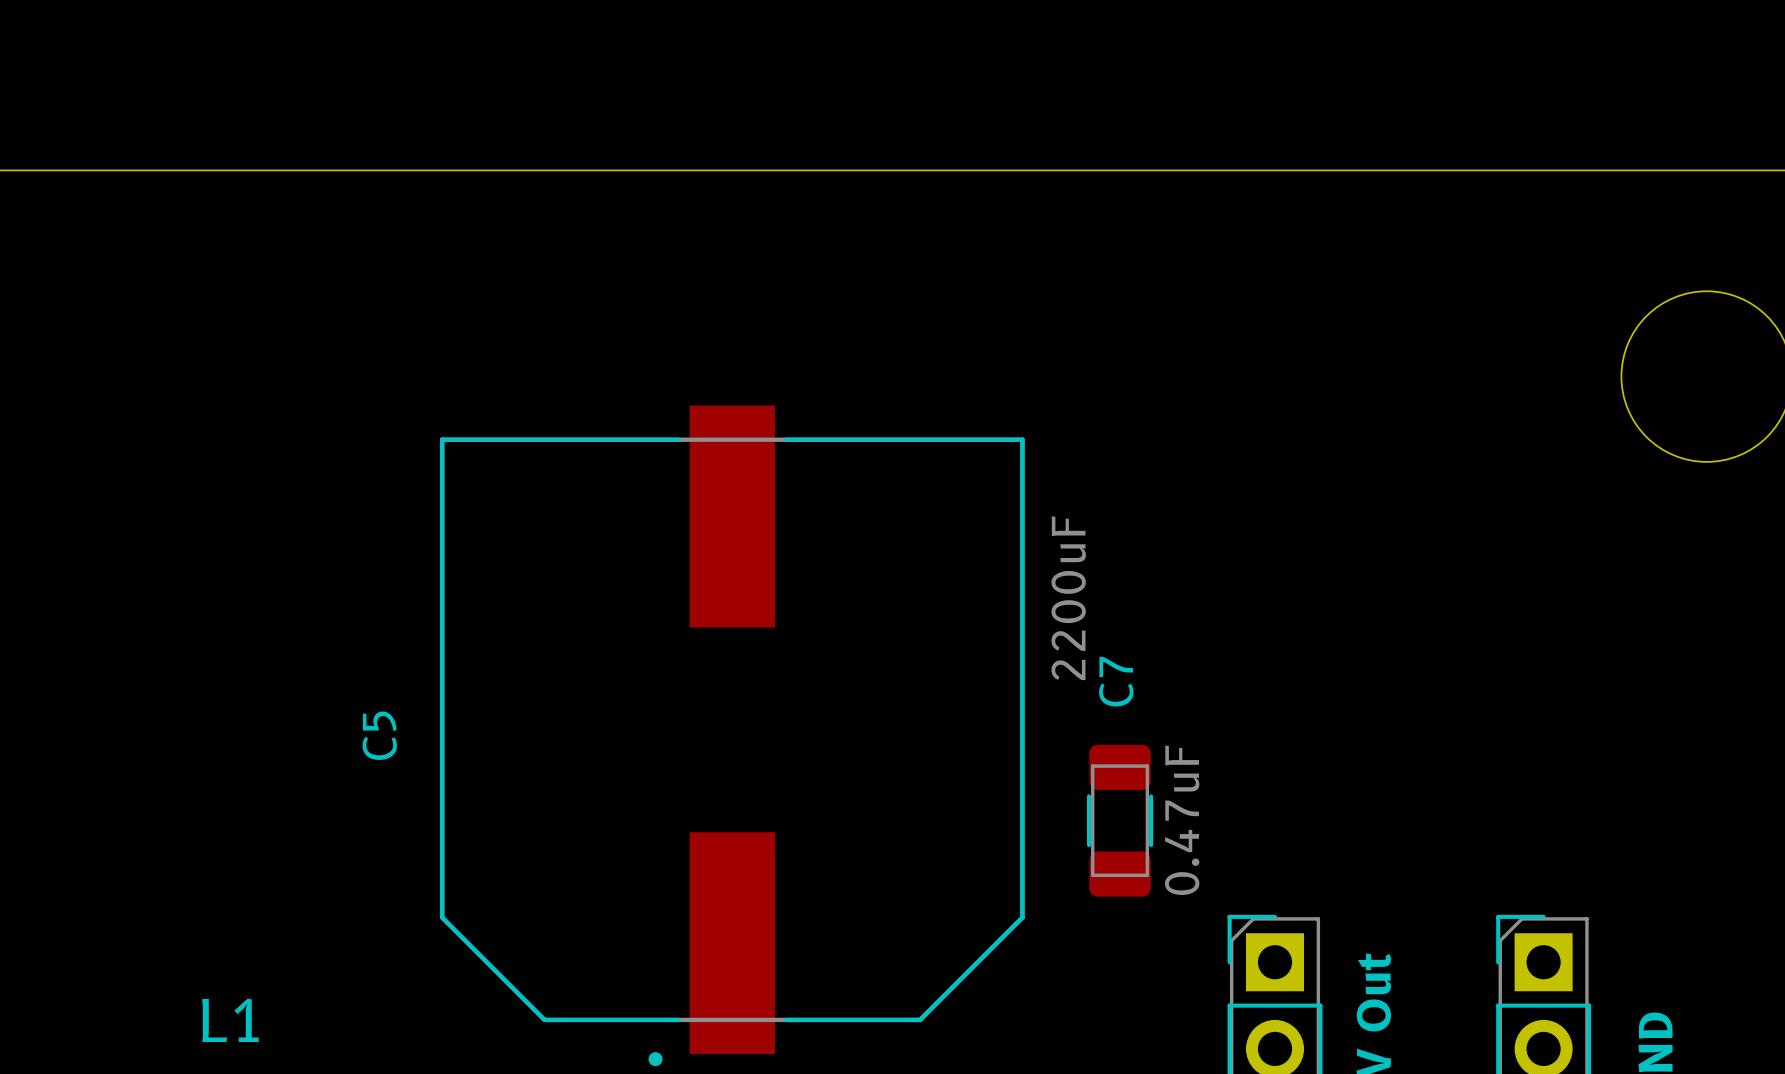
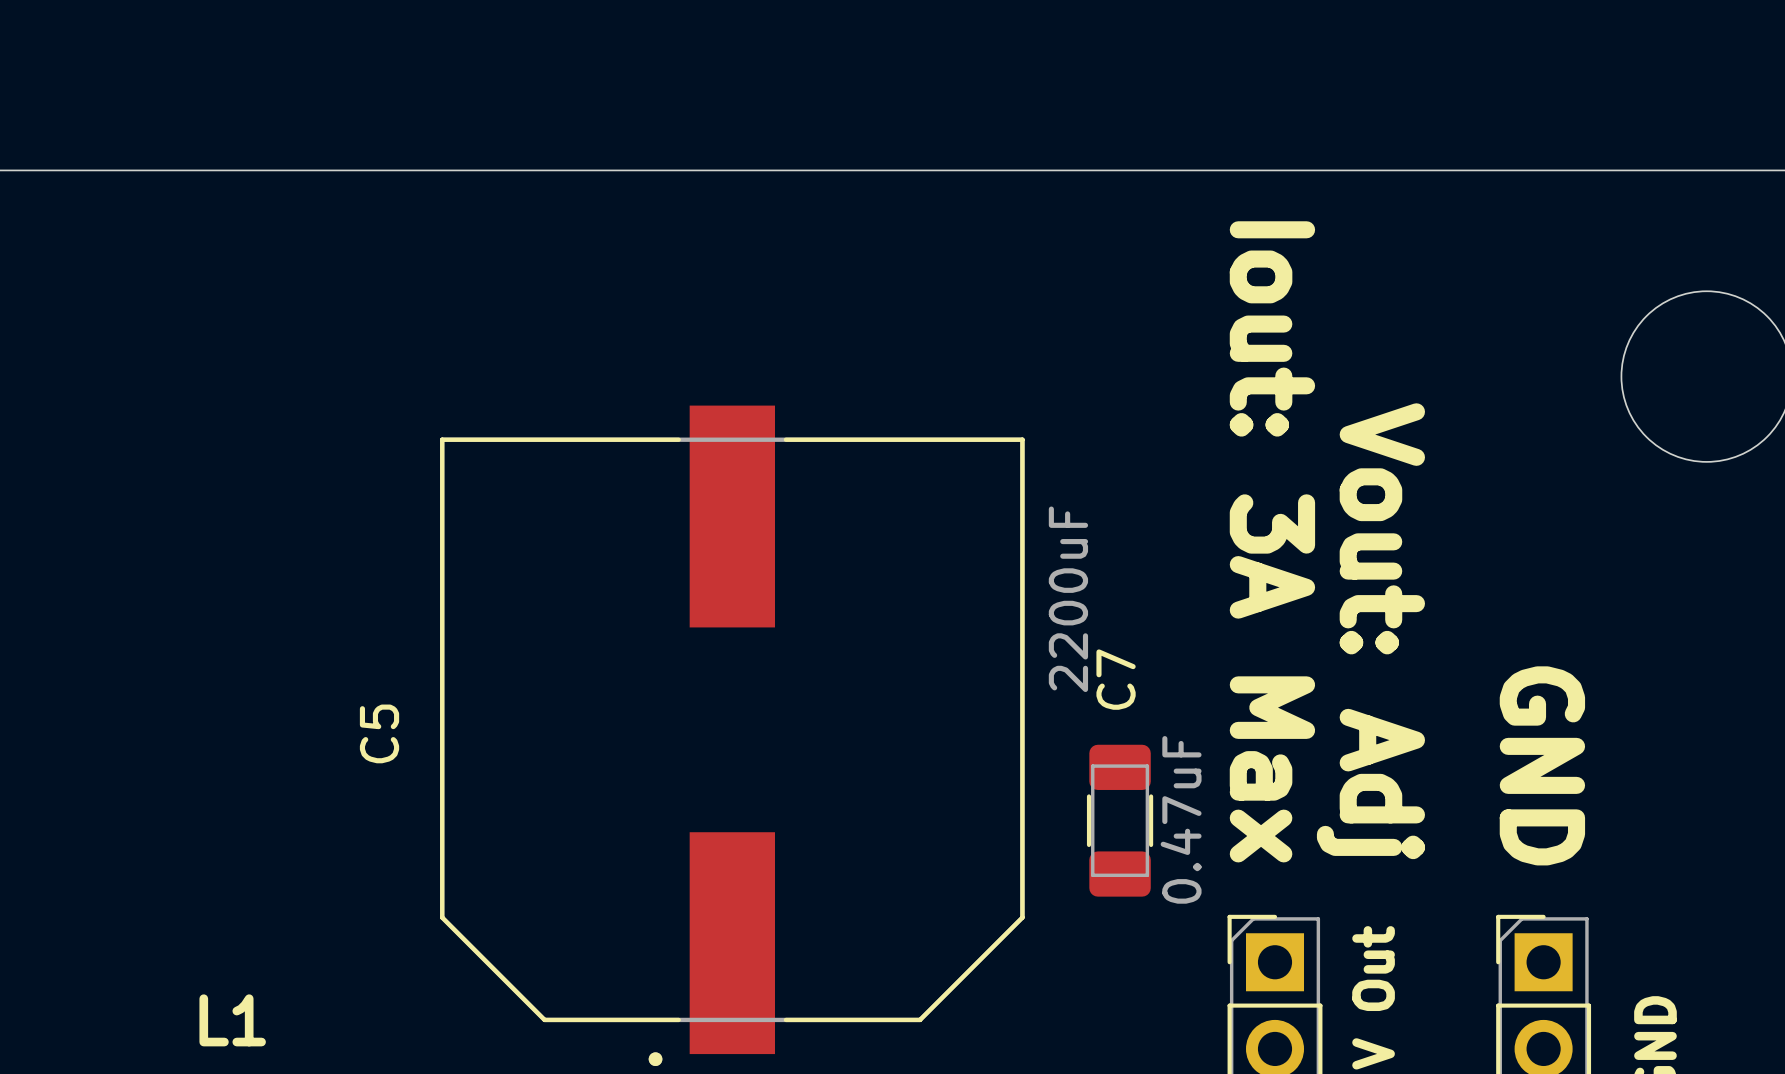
text: none -> Iout: 3A Max (1272, 541)
text: none -> Vout: Adj (1370, 631)
text: none -> GND (1542, 765)

